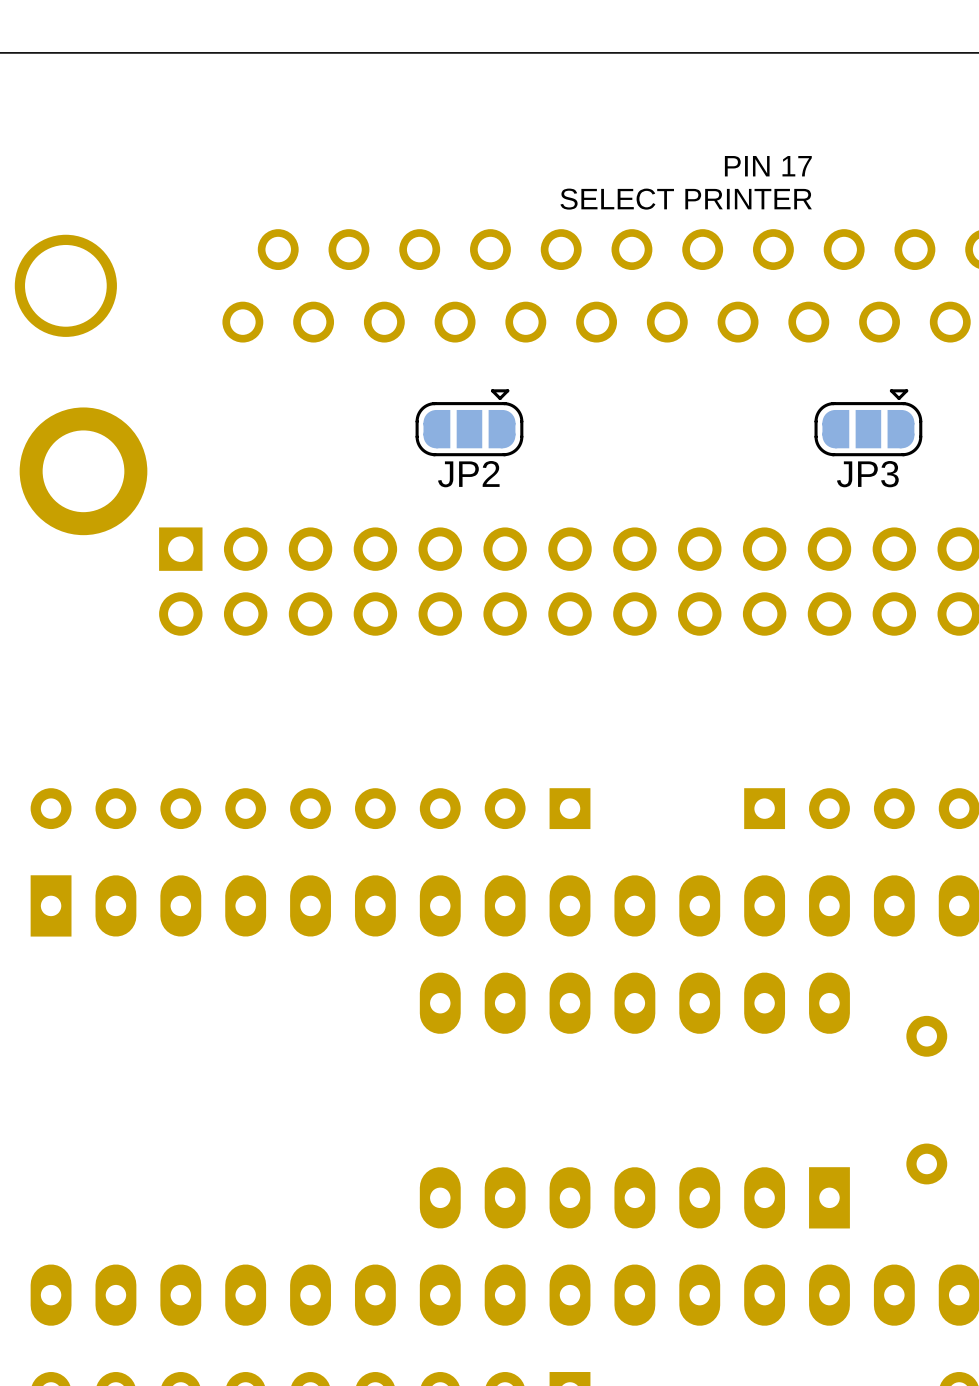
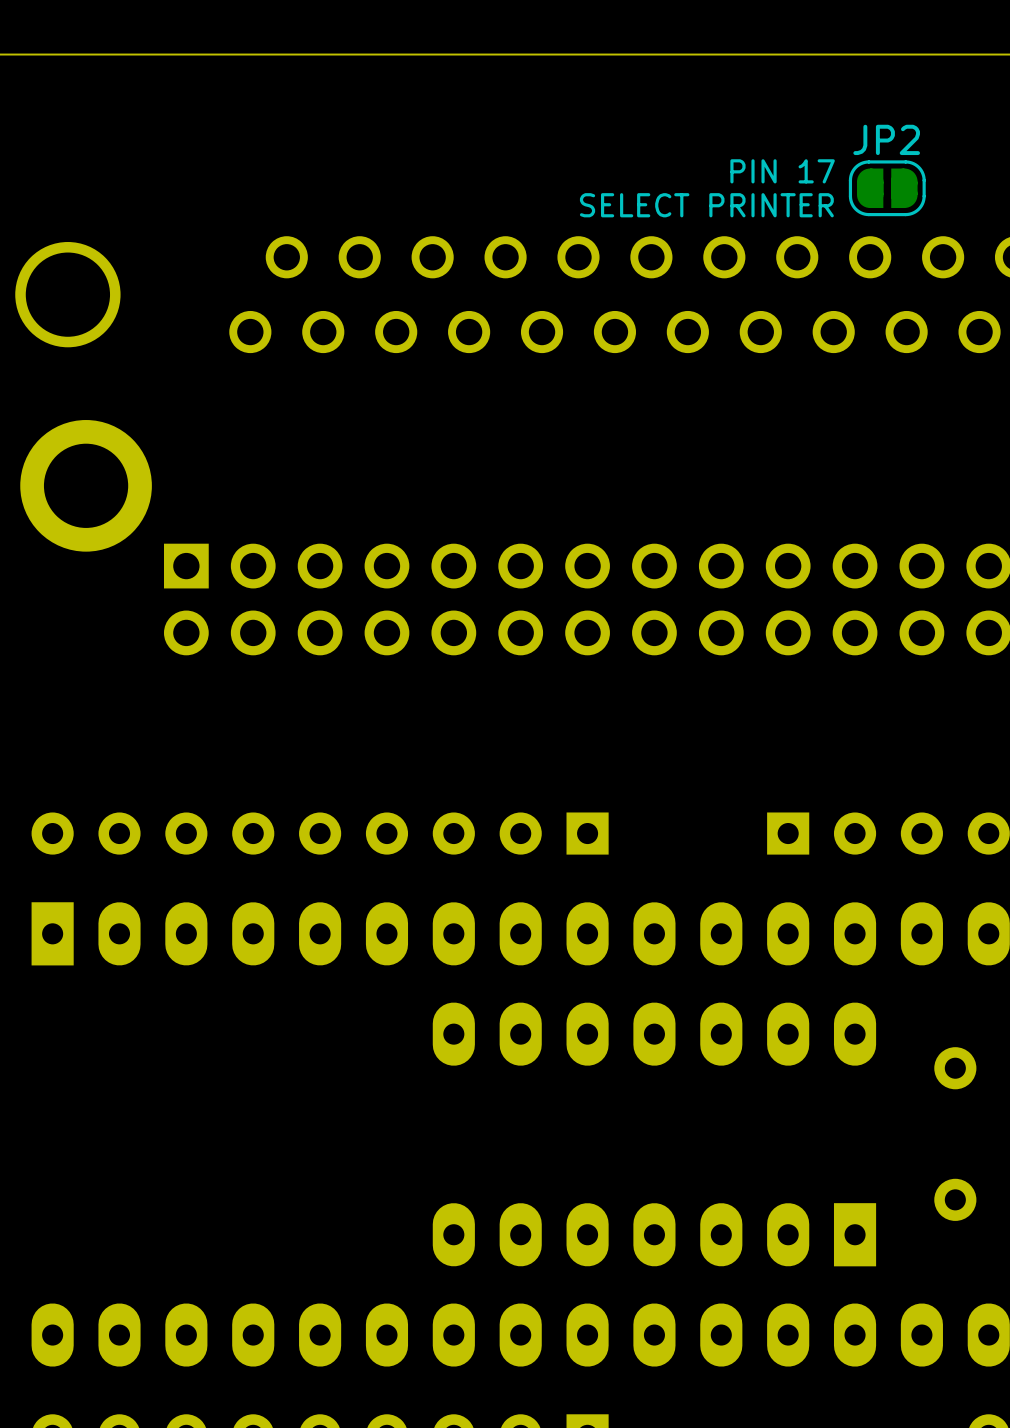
JP2 footprint: [415, 389, 524, 457] -> [848, 160, 926, 217]
JP3: (868, 422) -> none
JP2 name position: JP2 (468, 474) -> JP2 (886, 139)

